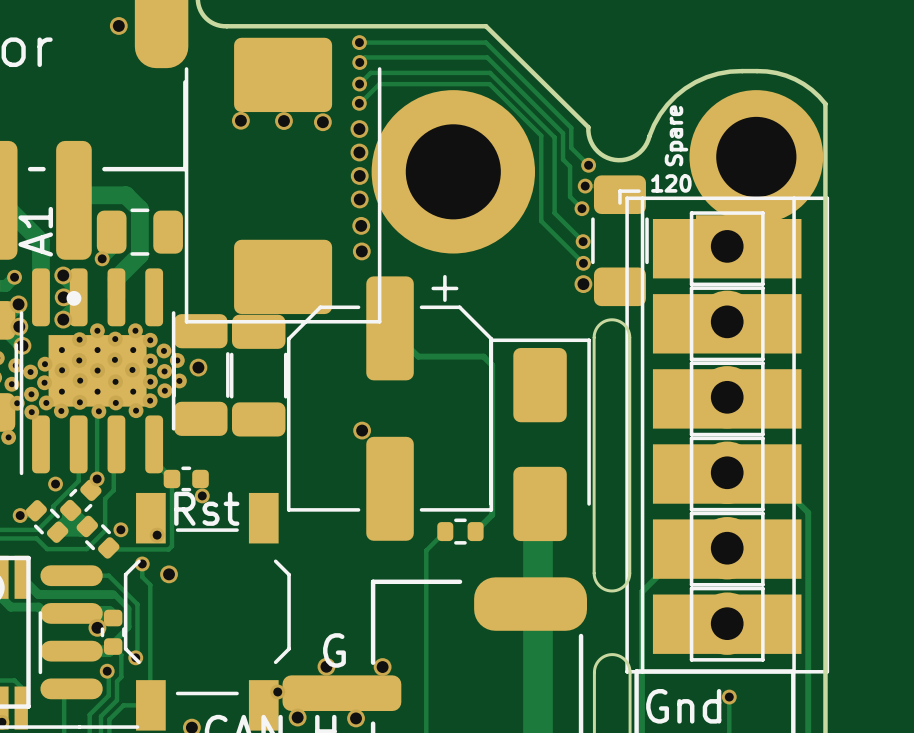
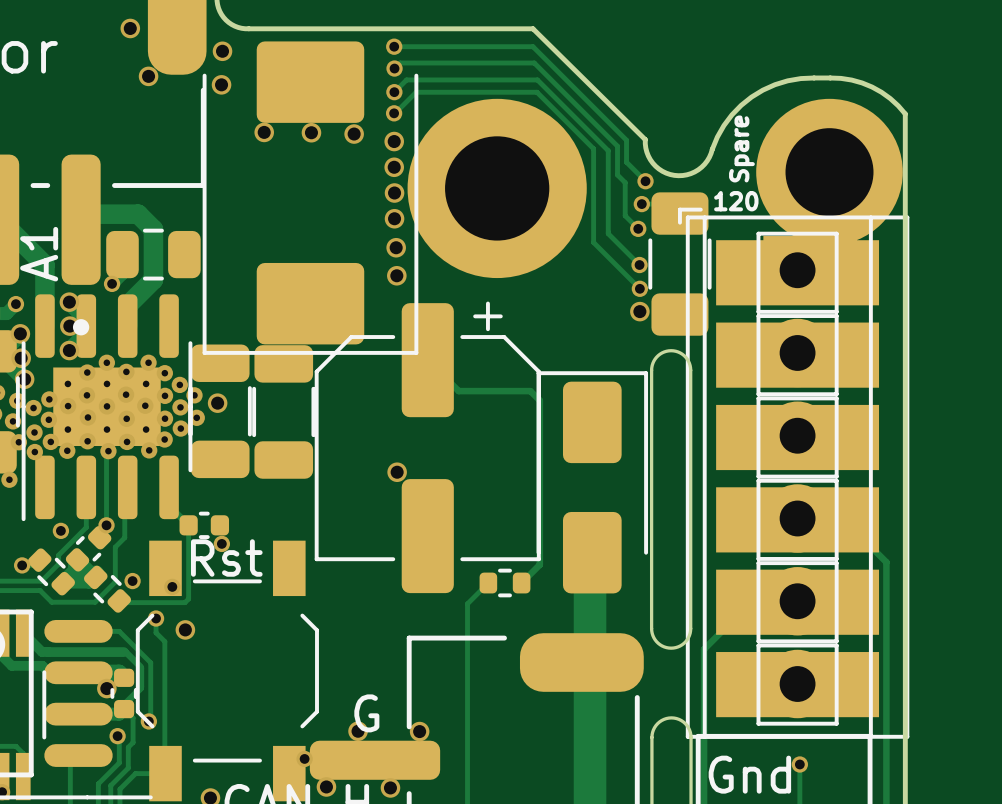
via: none -> (222, 51)
via: none -> (148, 76)
via: none -> (221, 84)

